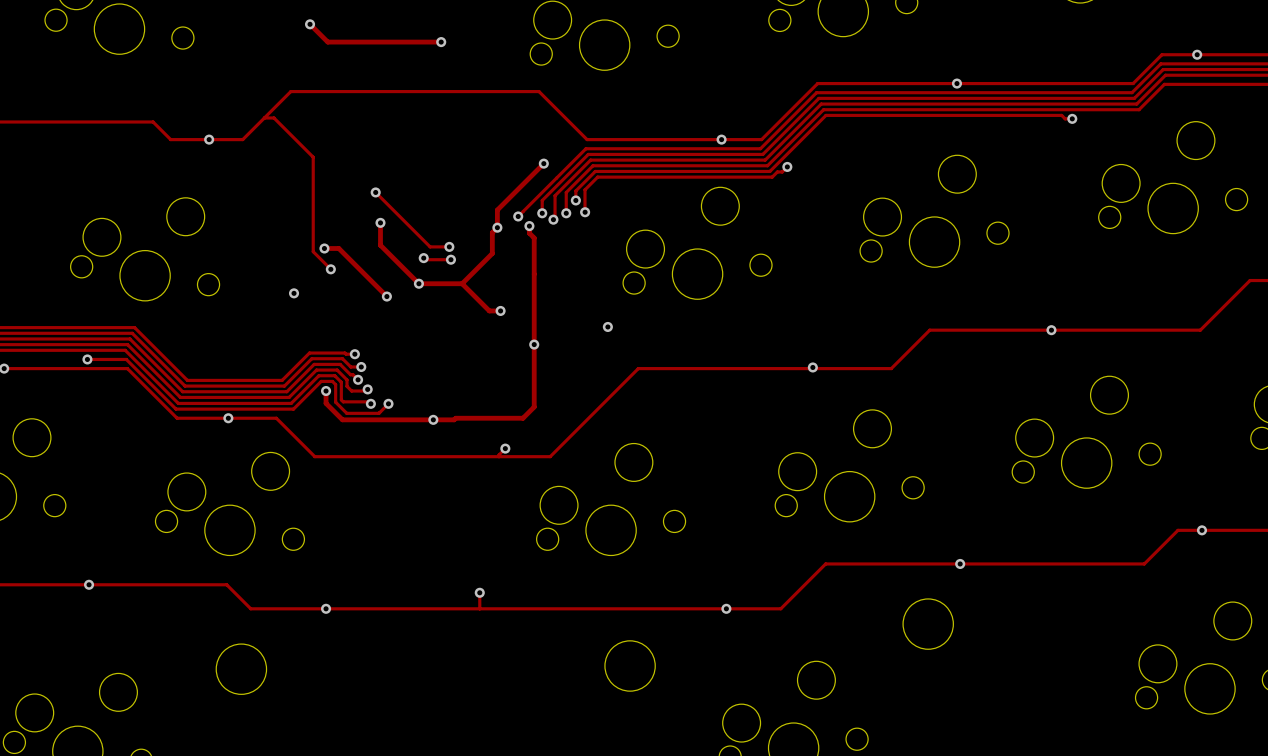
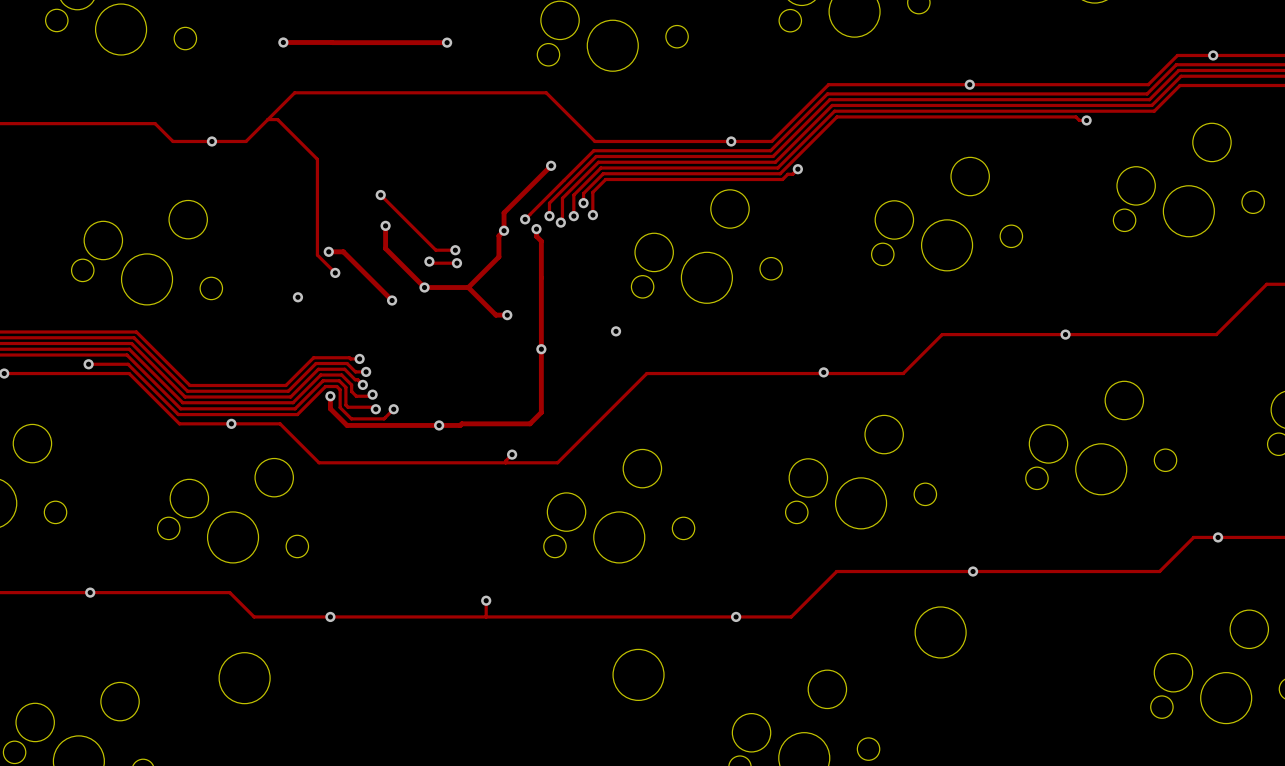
track: (310, 24) (327, 41) -> (283, 42) (332, 42)
via position: (310, 24) -> (283, 42)

